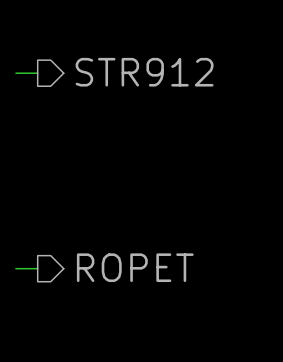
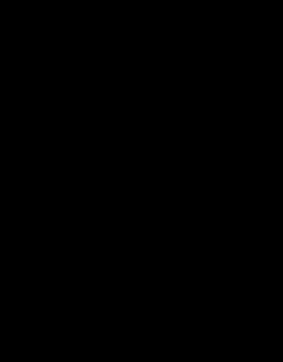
hierarchical label: STR912 (144, 72) -> none
wire: (15, 73) (37, 73) -> none
hierarchical label: ROPET (135, 267) -> none
wire: (15, 268) (37, 268) -> none

